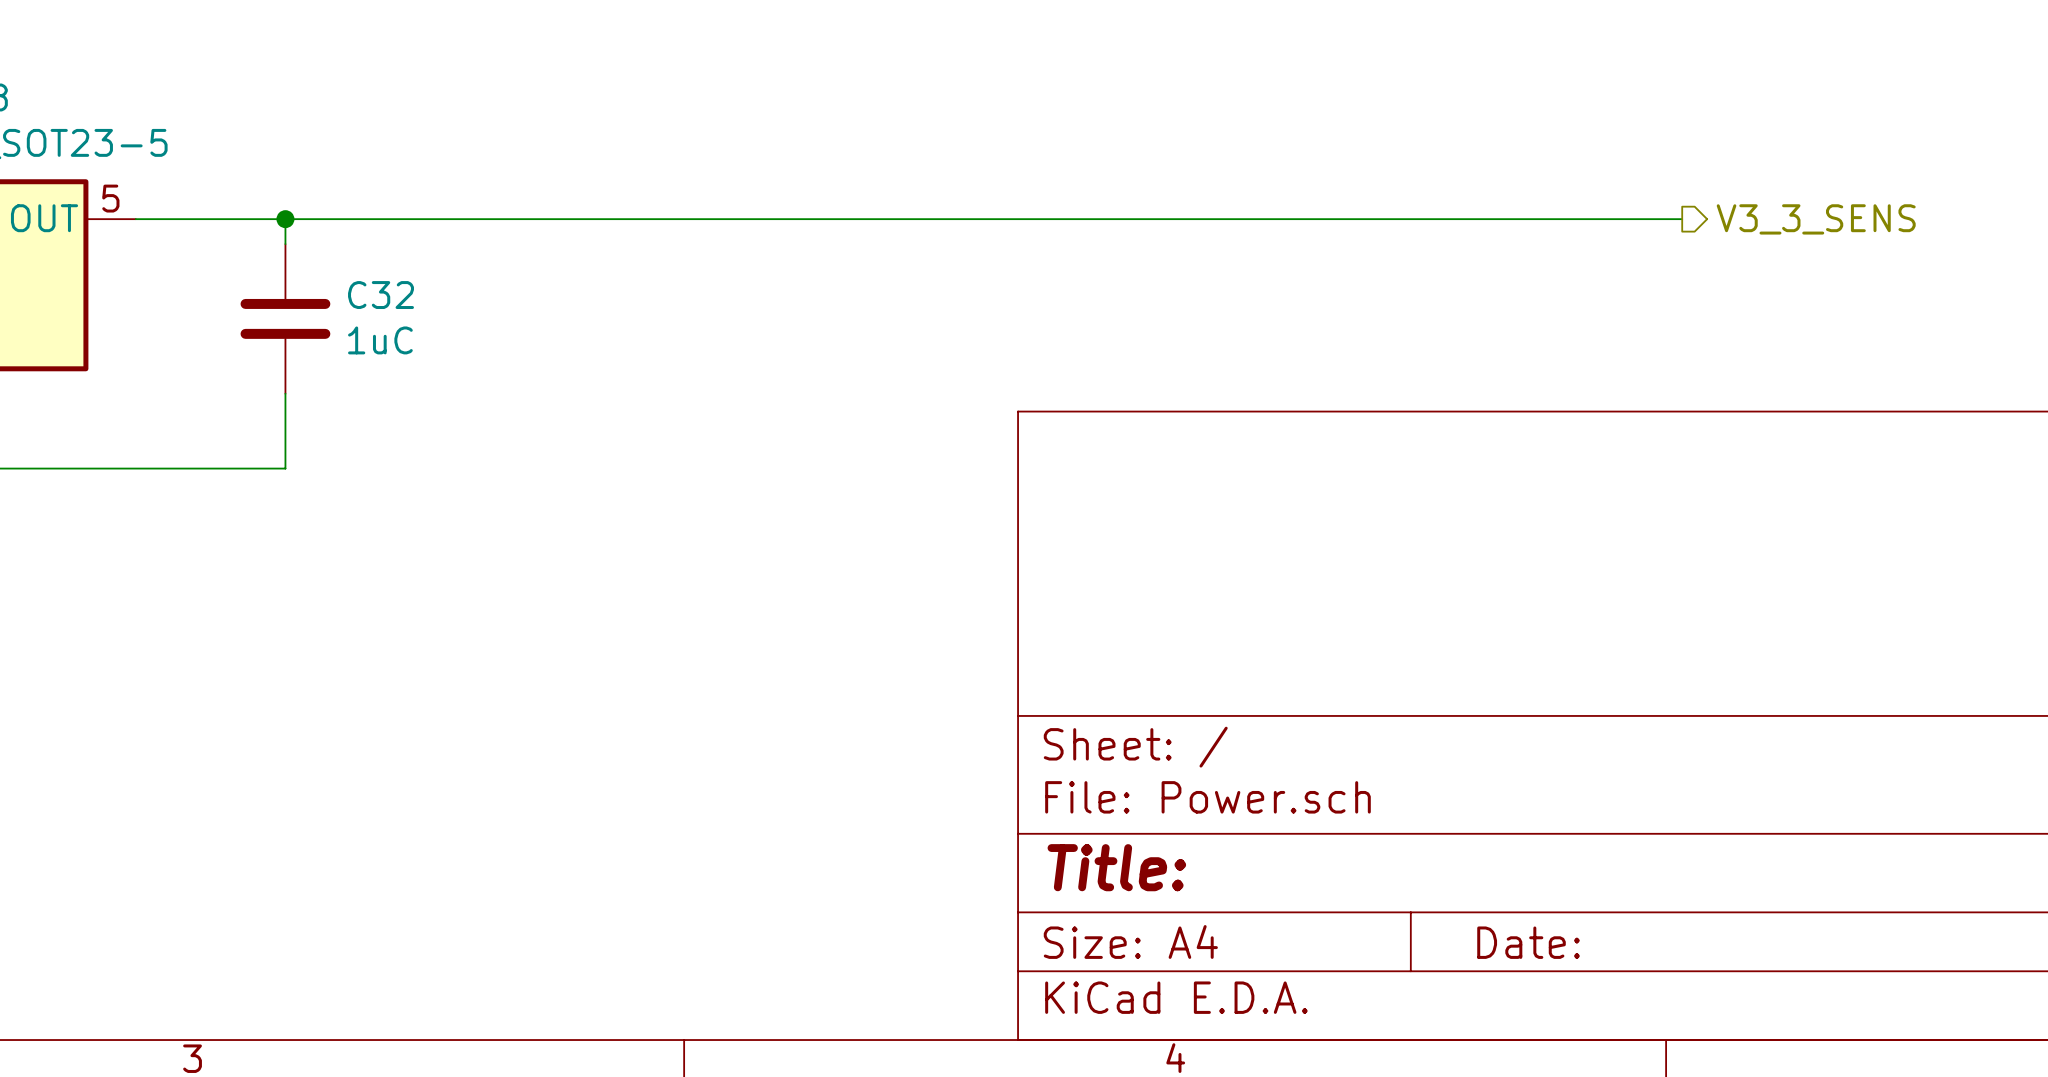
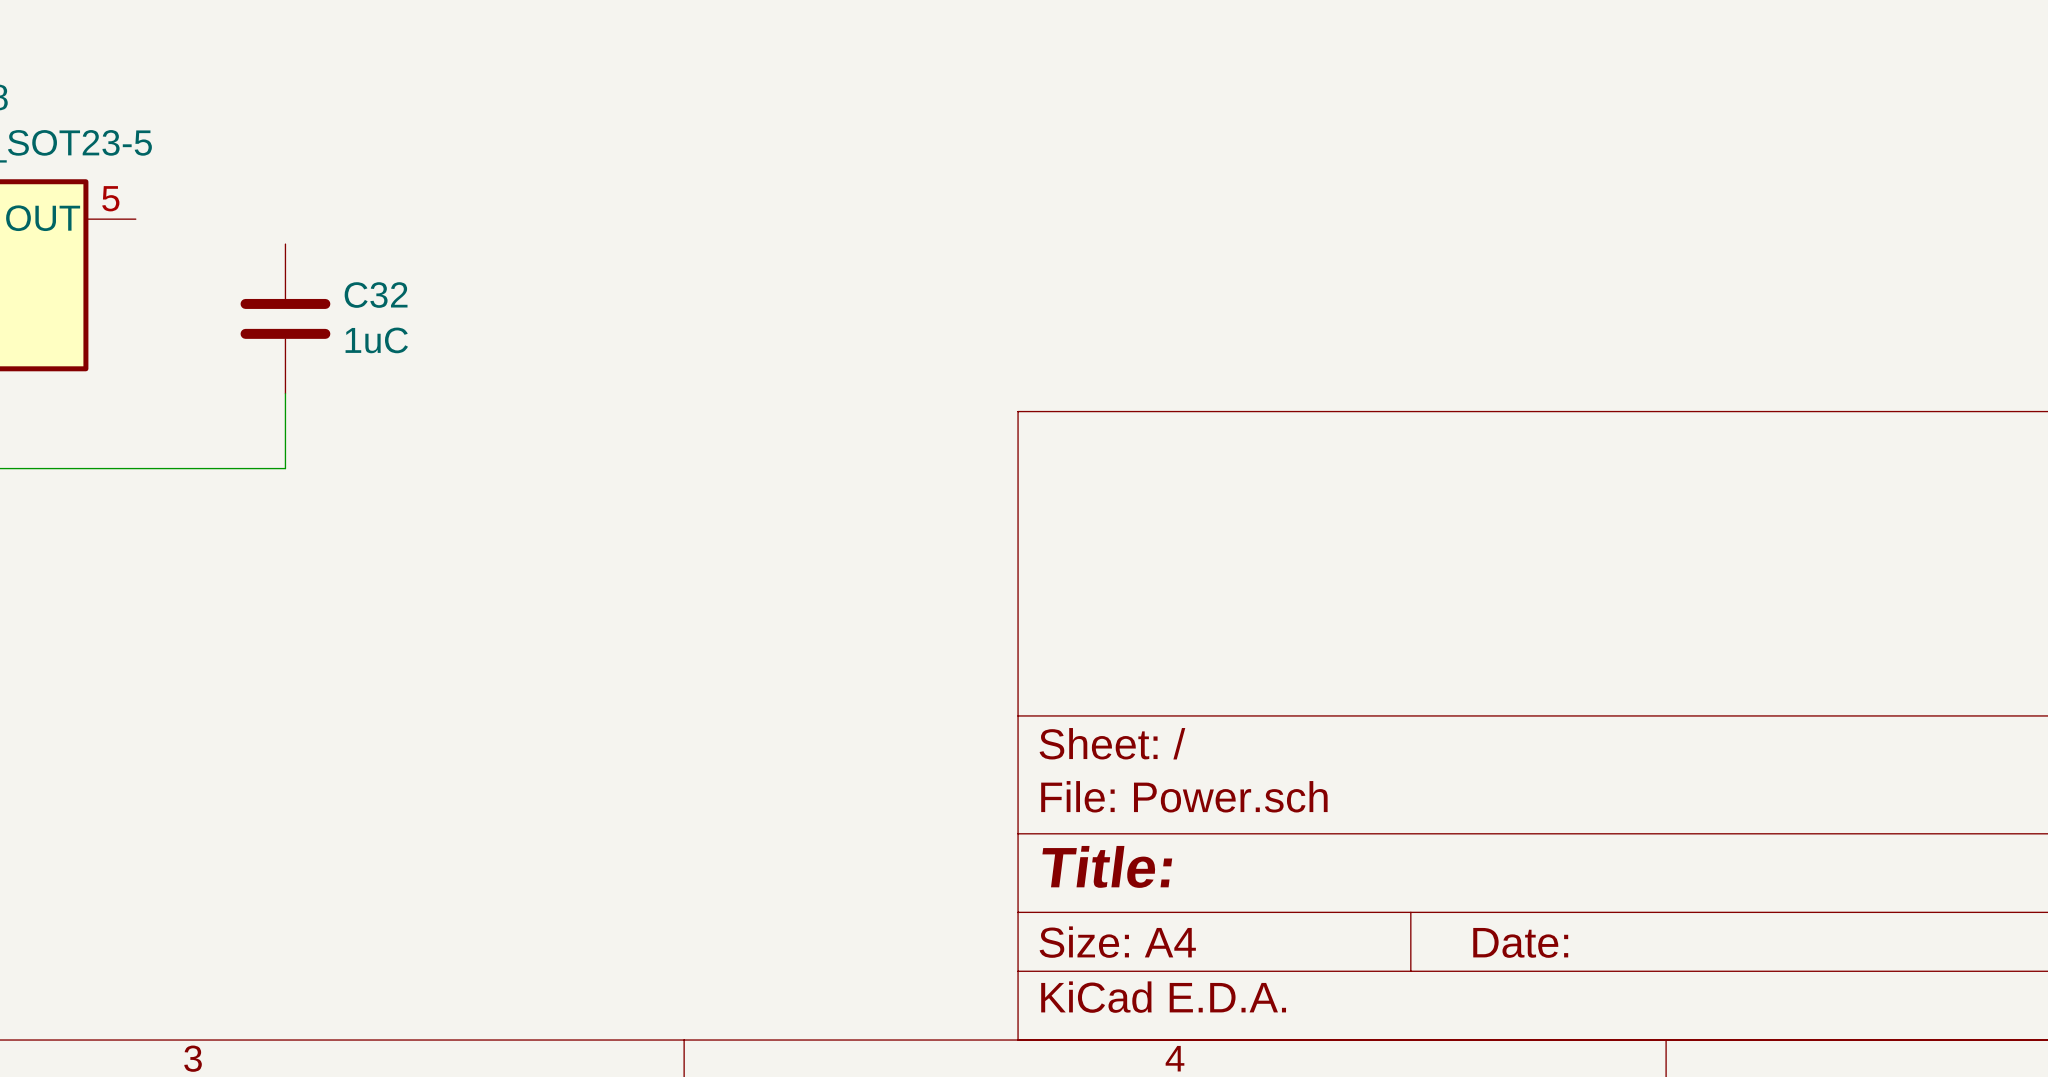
wire: (135, 219) (1682, 219) -> none
wire: (285, 219) (285, 244) -> none
junction: (285, 219) -> none
hierarchical label: V3_3_SENS (1816, 219) -> none

